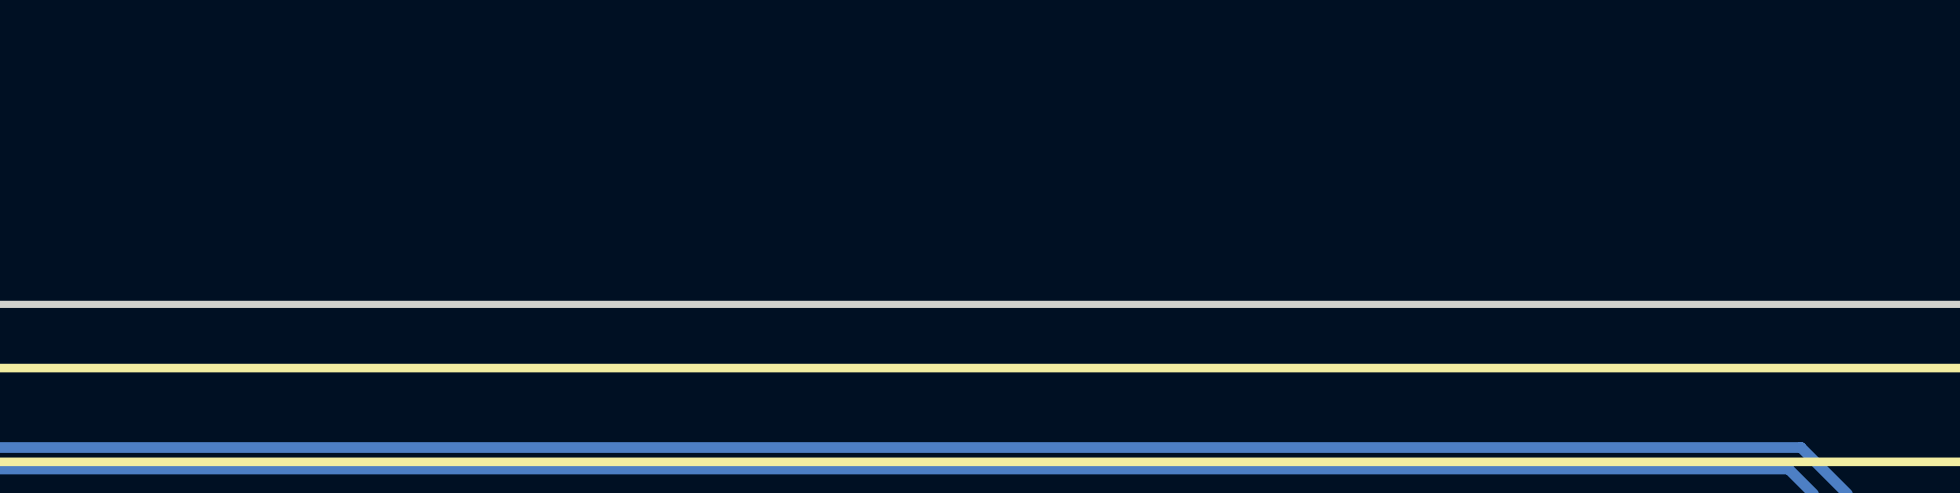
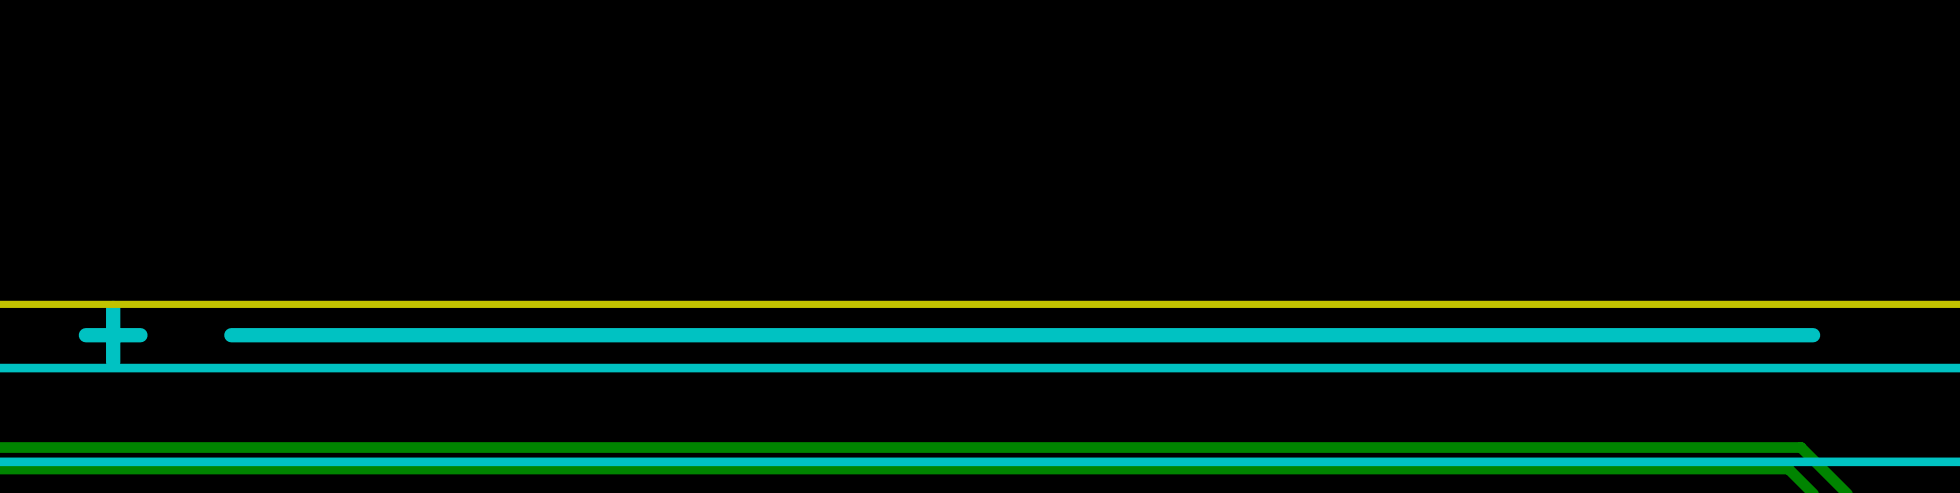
line: none -> (113, 307) (113, 362)
line: none -> (85, 335) (140, 335)
line: none -> (231, 335) (1813, 335)

